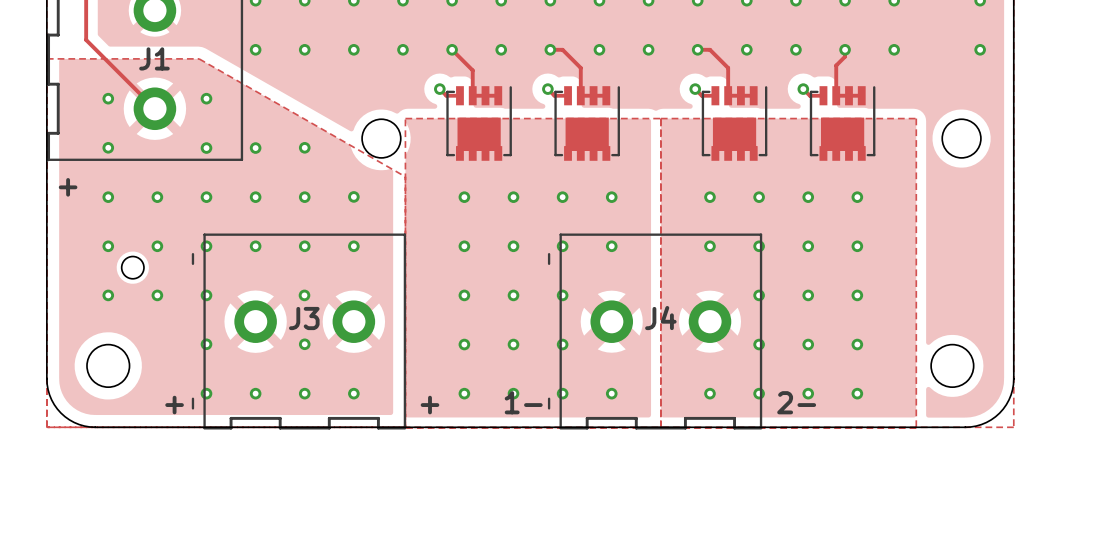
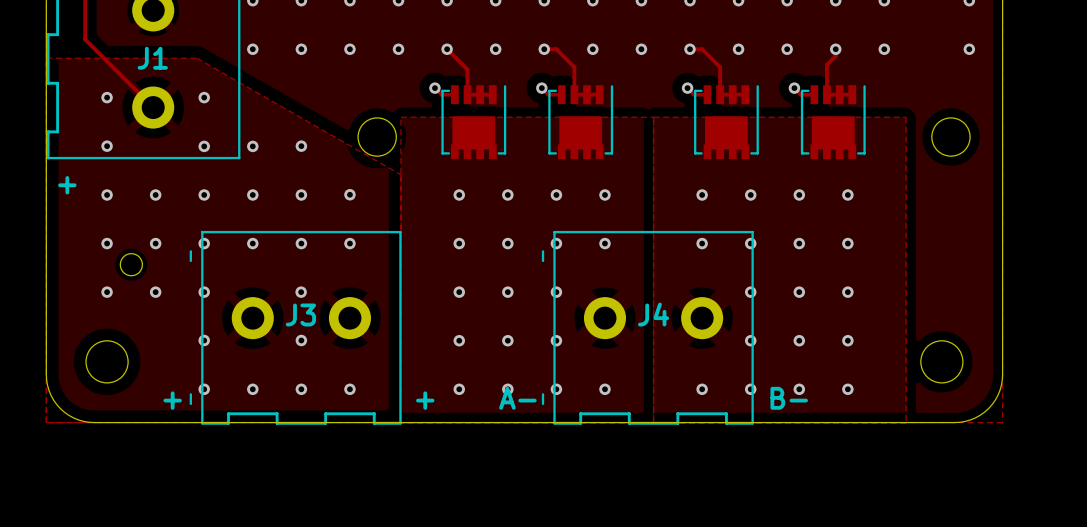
J4 text: 1- (523, 402) -> A- (517, 398)
J4 text: 2- (796, 402) -> B- (789, 398)

